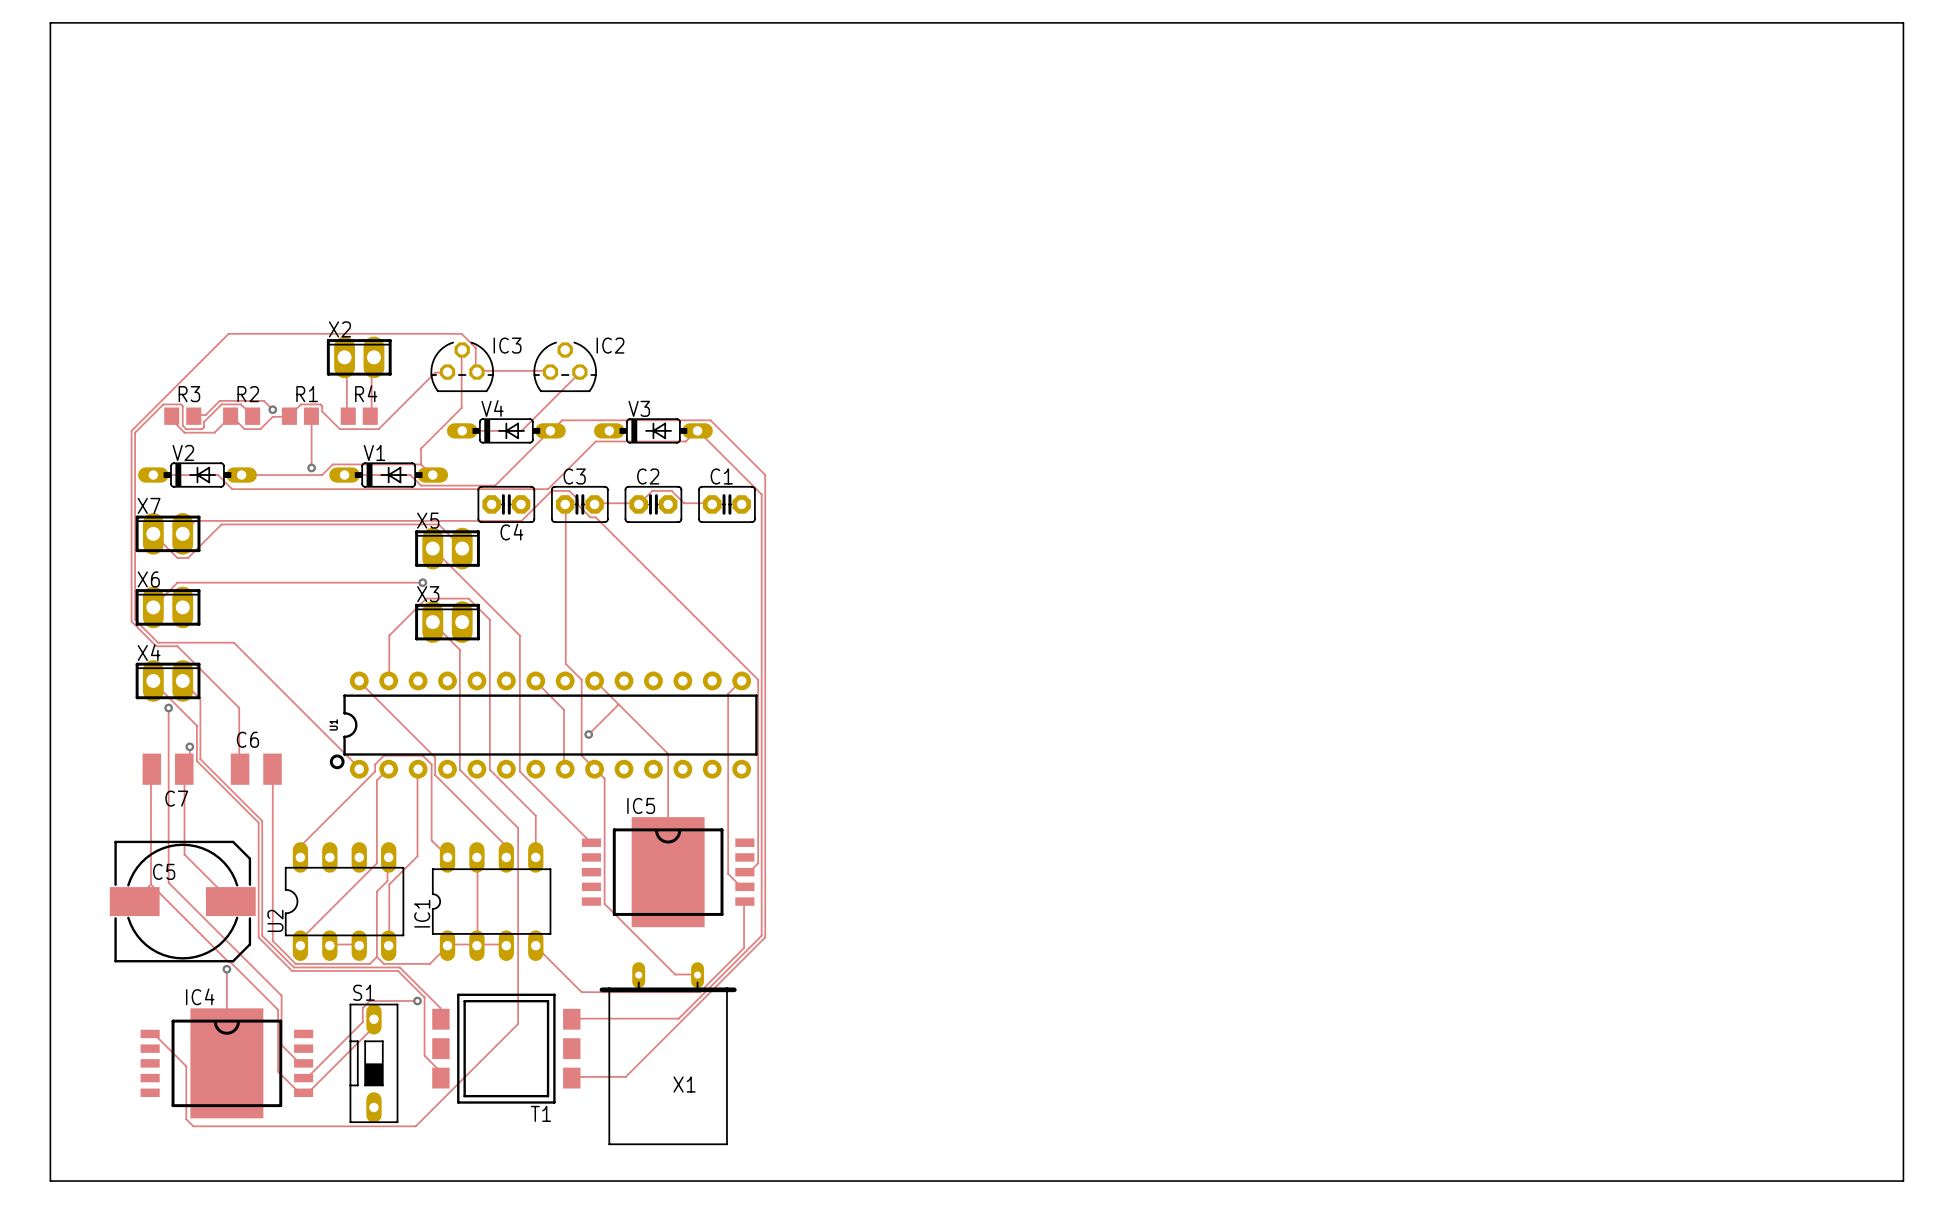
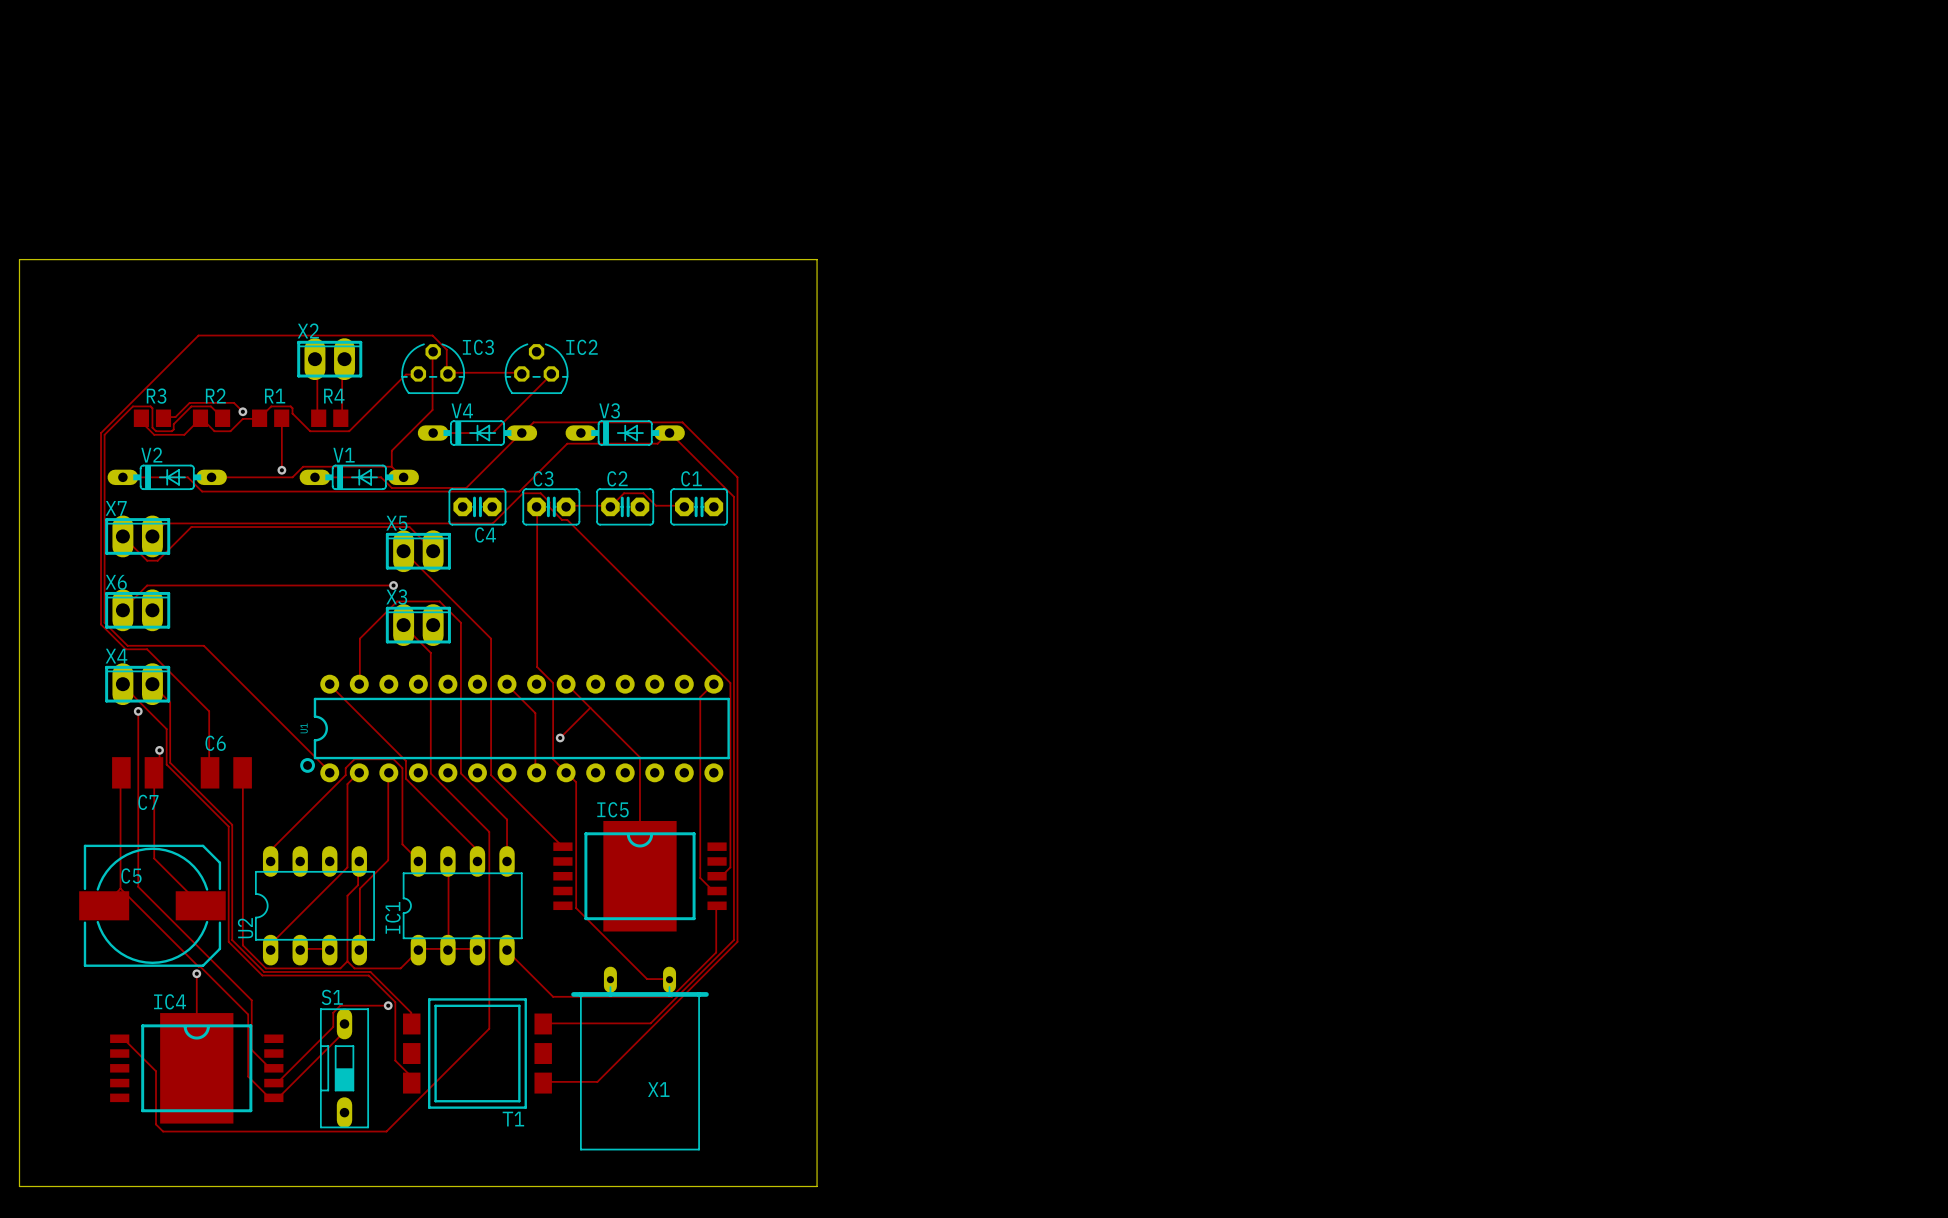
board edge: (50, 258) (50, 22) (1903, 22) (1903, 1181) (844, 1181) -> (19, 259) (817, 259) (817, 1186)

